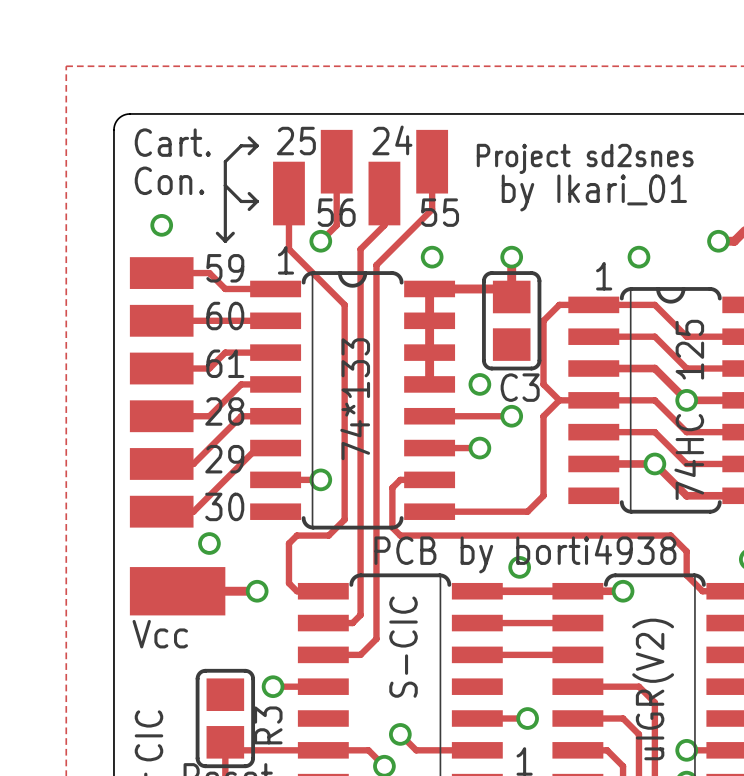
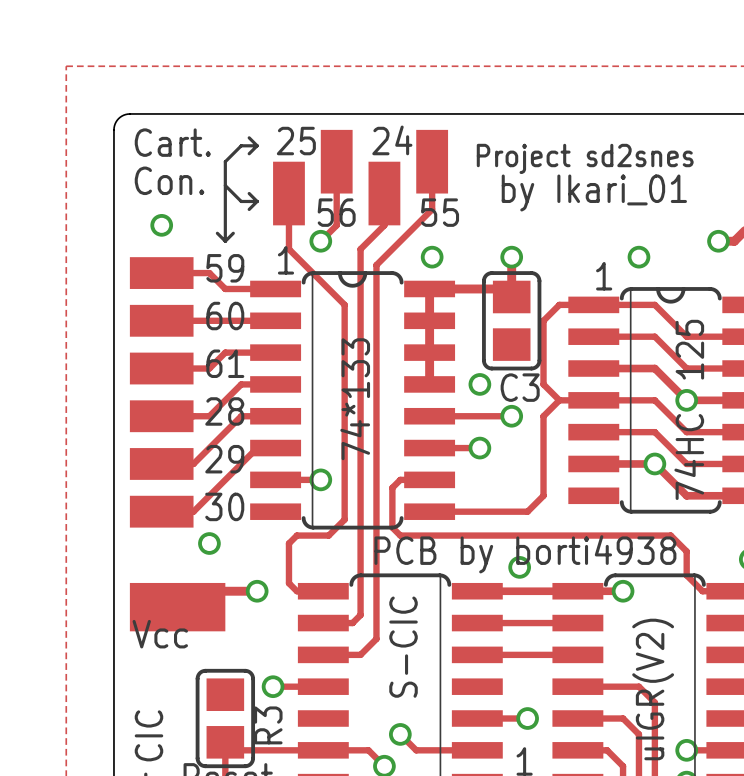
part position: (177, 591) -> (177, 607)

